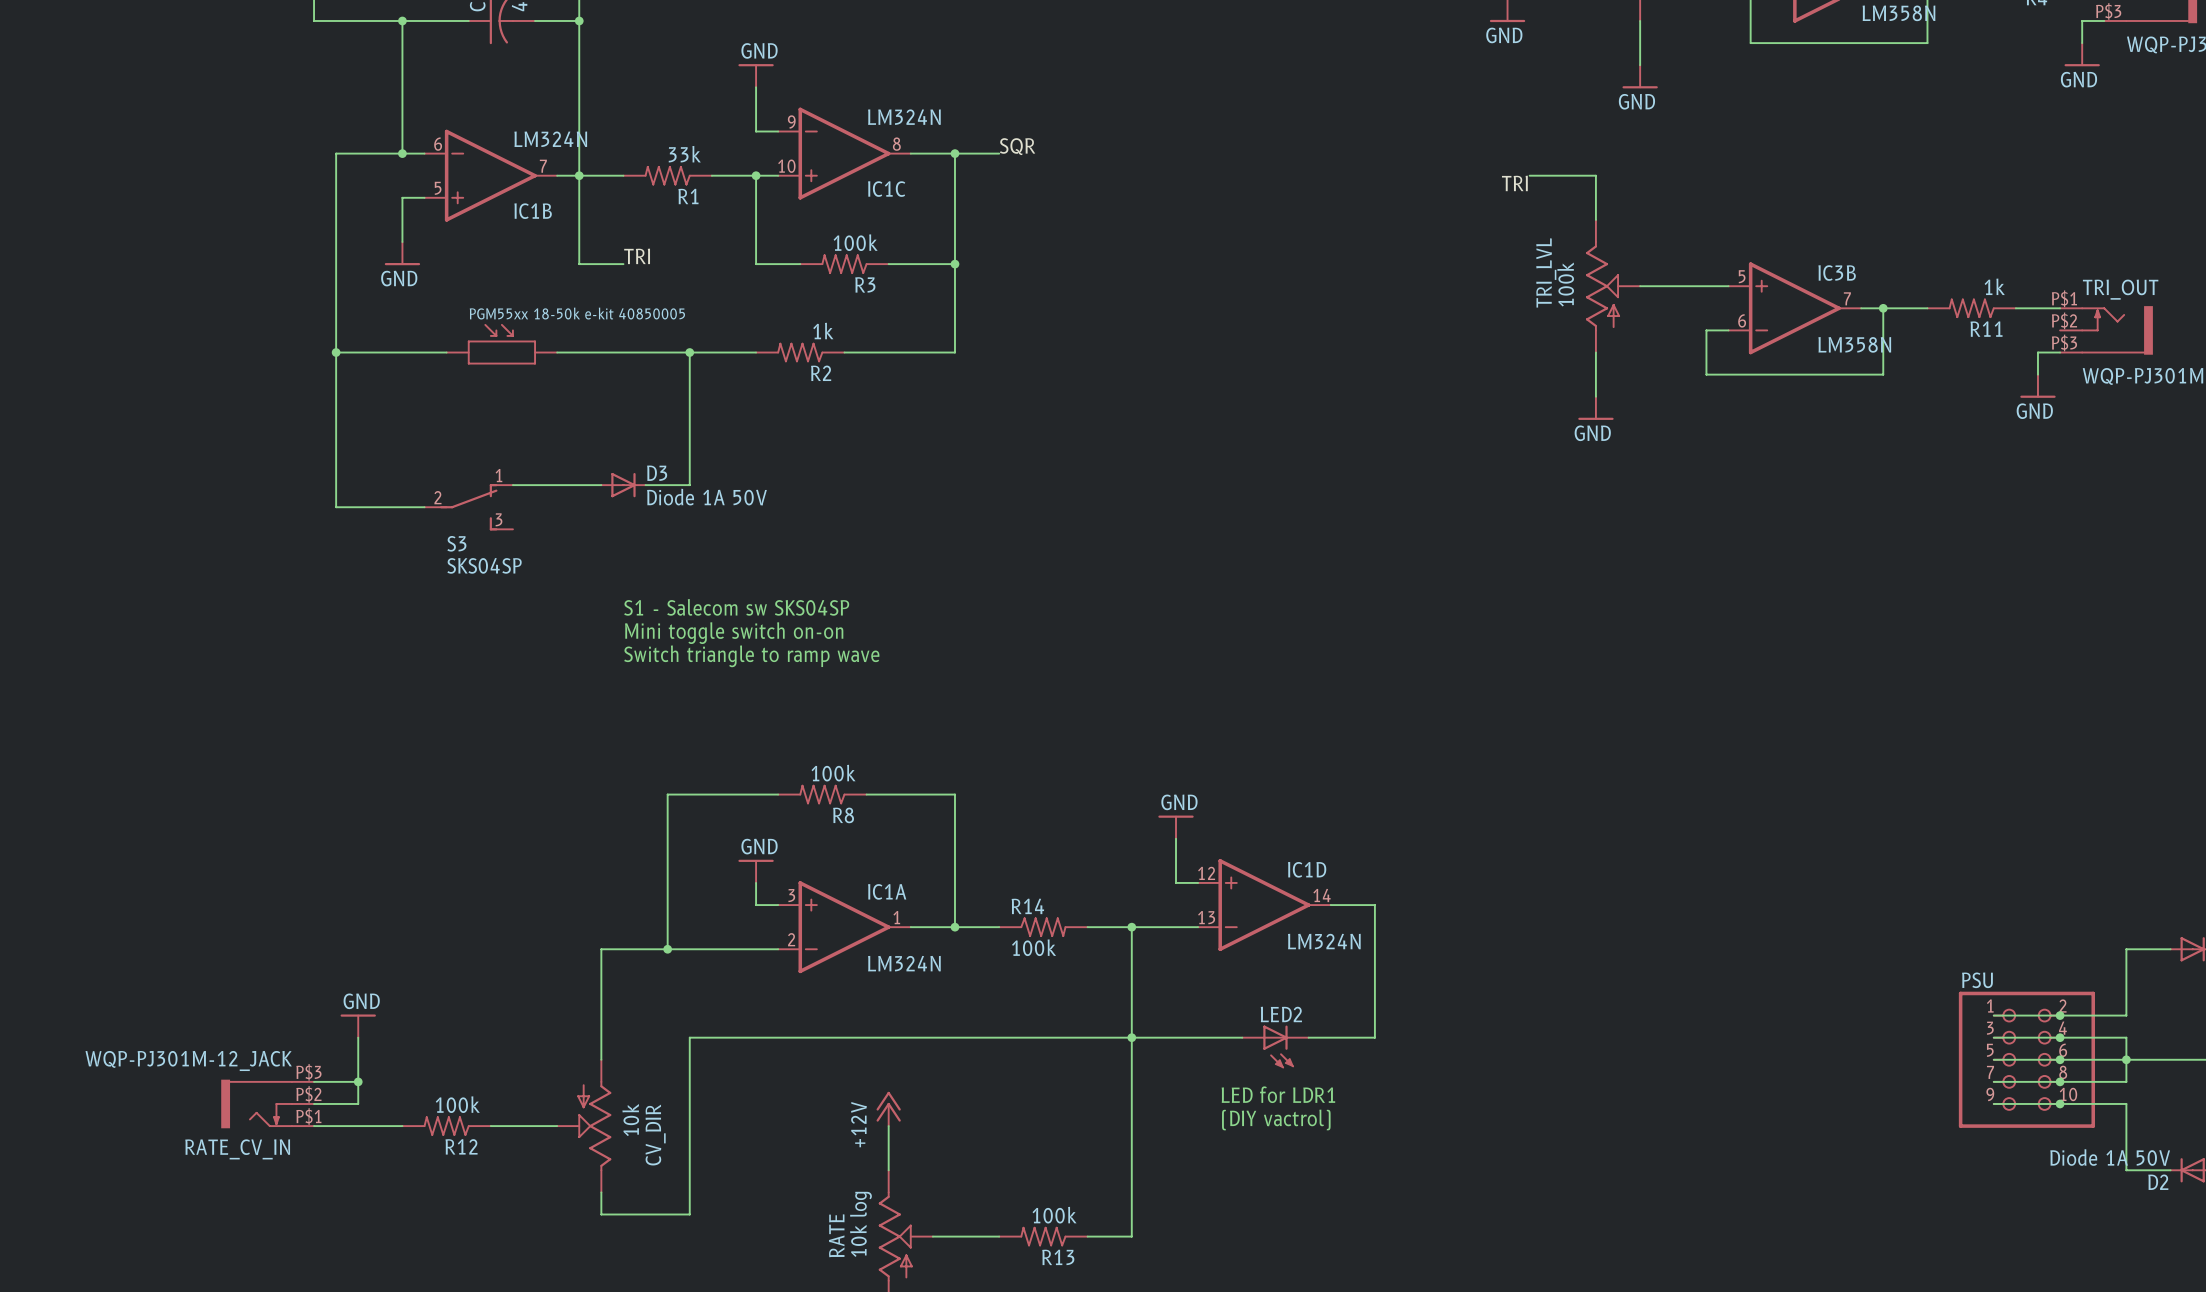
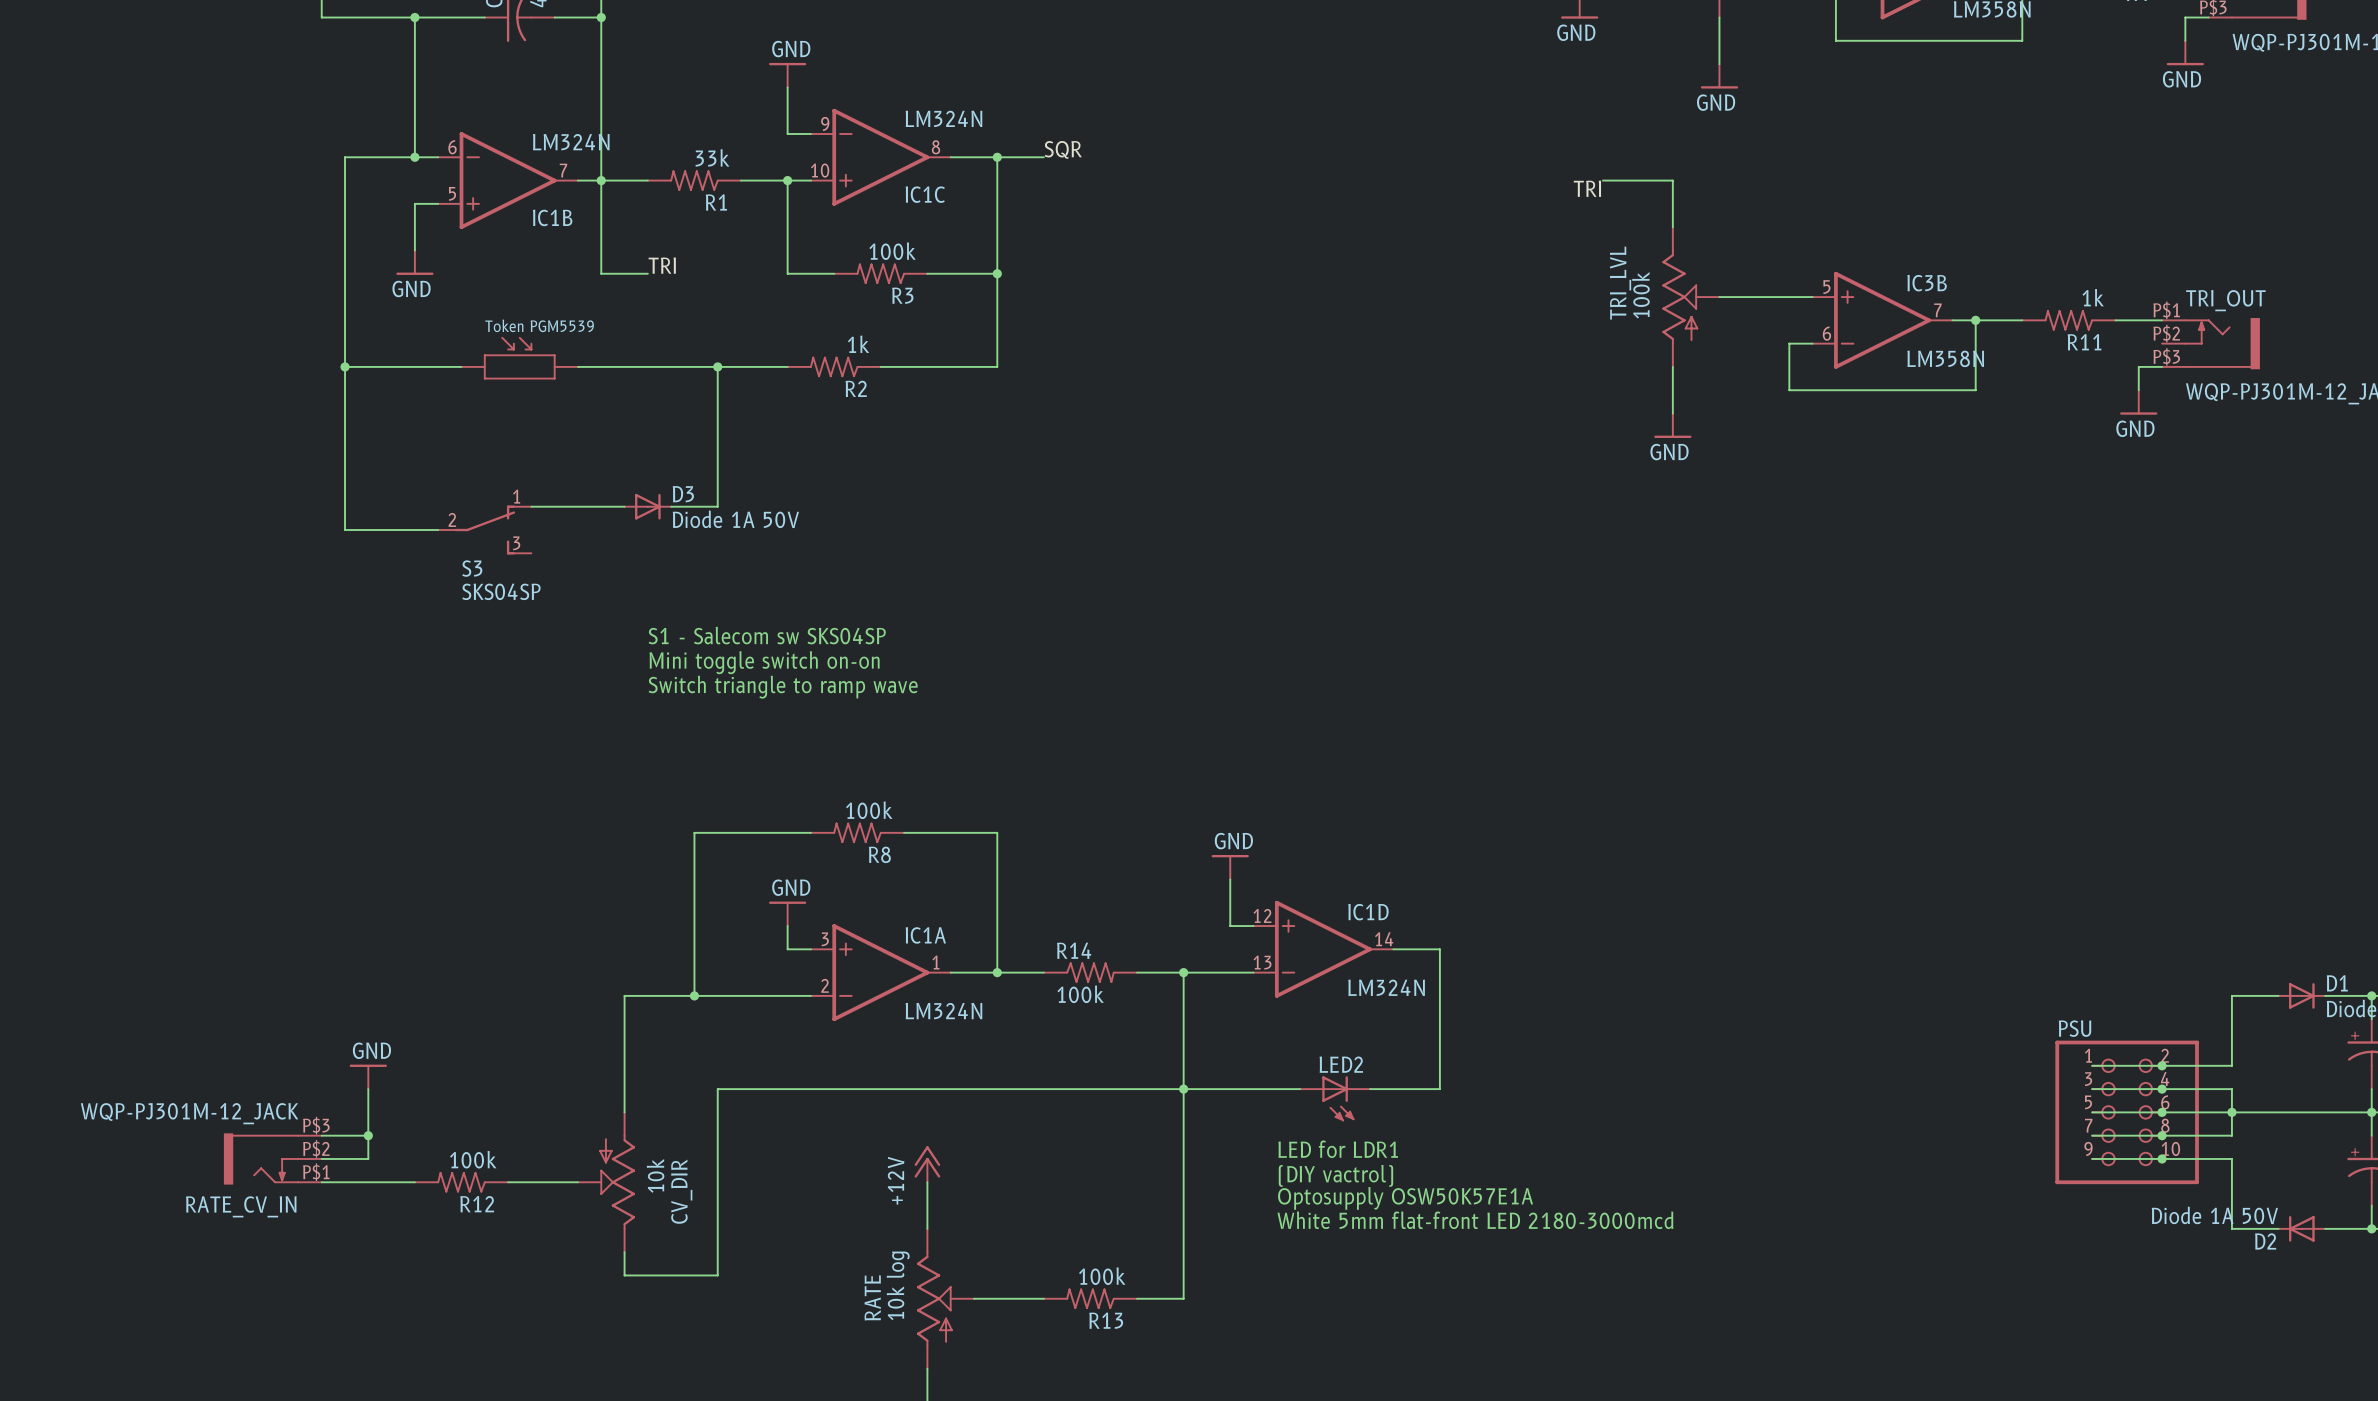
part value: PGM55xx 18-50k e-kit 40850005 (577, 313) -> Token PGM5539 (539, 325)
text: none -> Optosupply OSW50K57E1A (1405, 1198)
text: none -> White 5mm flat-front LED 2180-3000mcd (1475, 1220)

